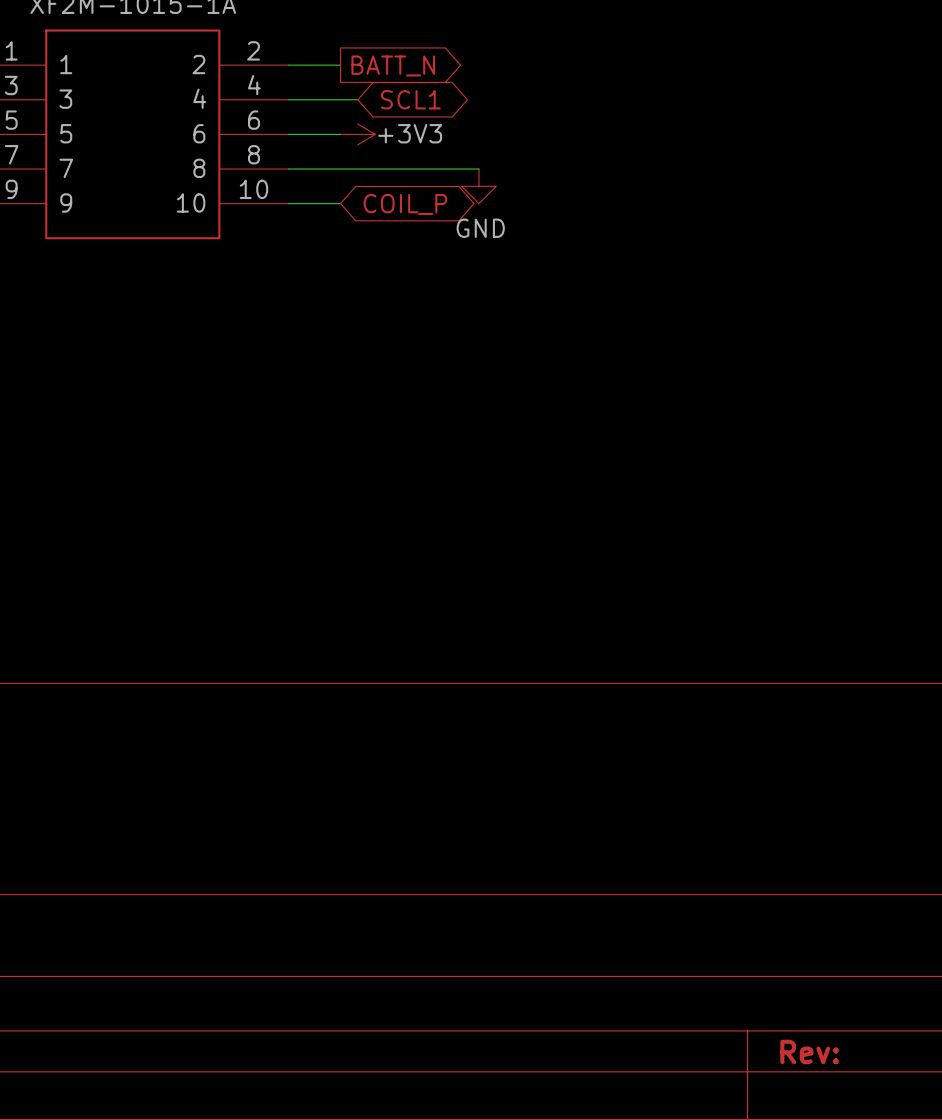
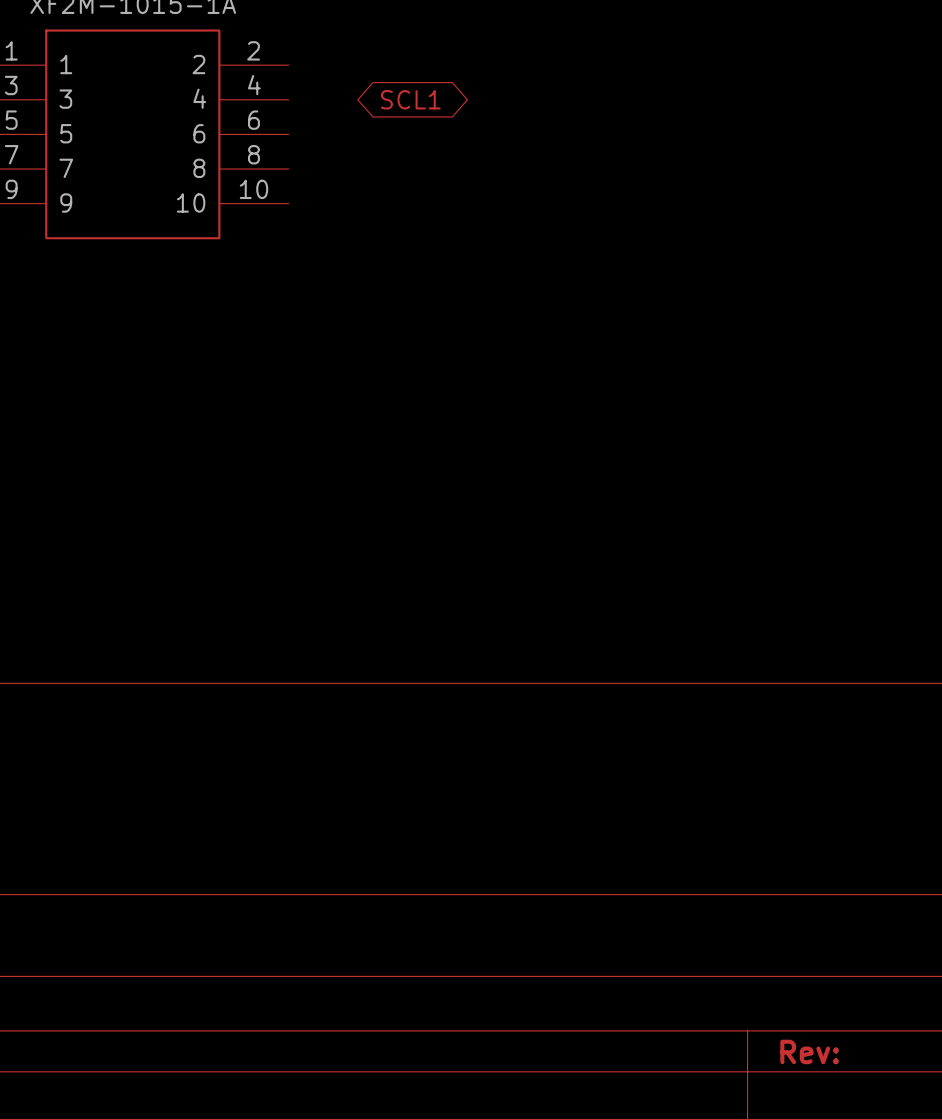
wire: (288, 65) (340, 65) -> none
global label: BATT_N (393, 65) -> none
wire: (288, 99) (357, 99) -> none
wire: (288, 134) (340, 134) -> none
power symbol: +3V3 (357, 134) -> none
wire: (288, 169) (479, 169) -> none
power symbol: GND (479, 186) -> none
wire: (288, 203) (340, 203) -> none
global label: COIL_P (405, 204) -> none

